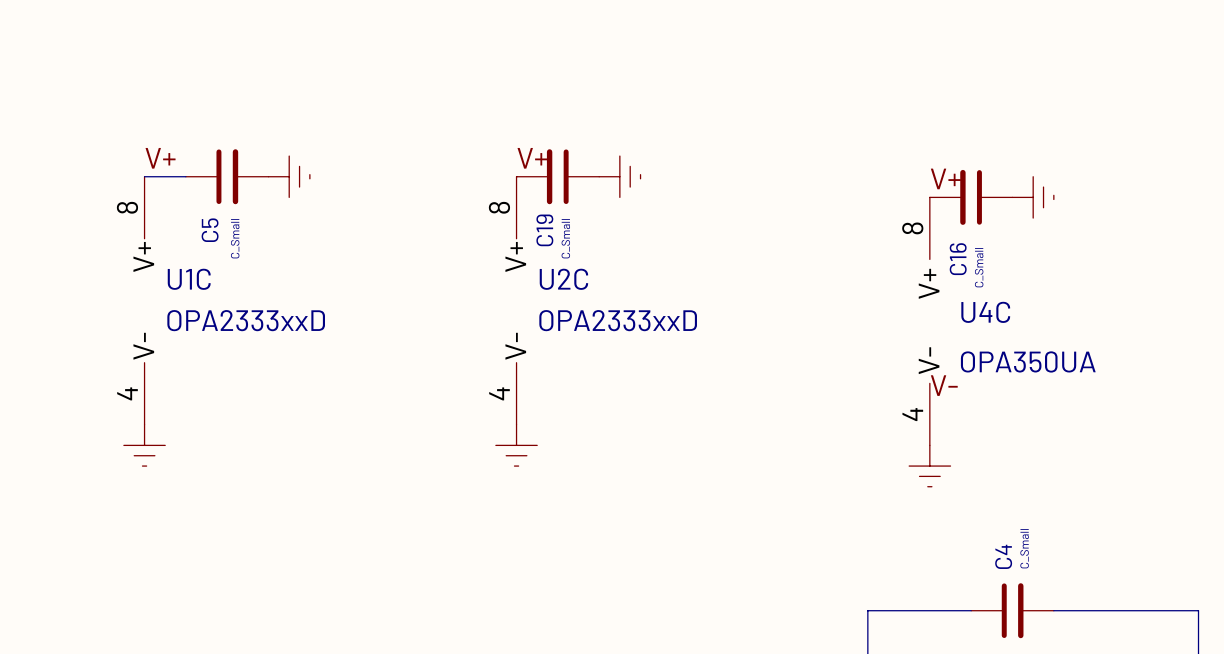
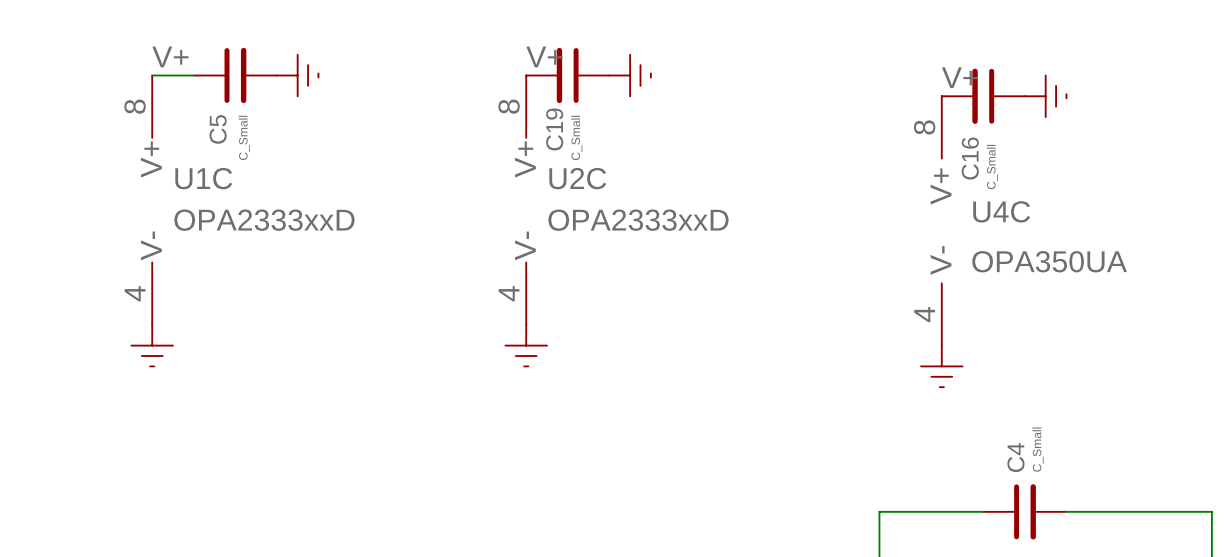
label: V- (944, 385) -> none

